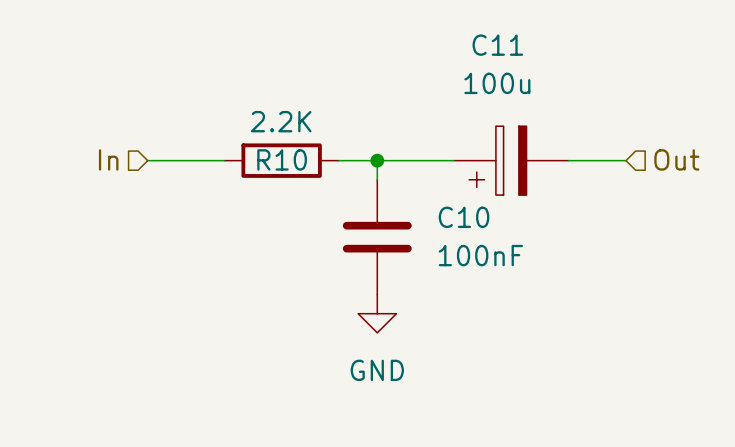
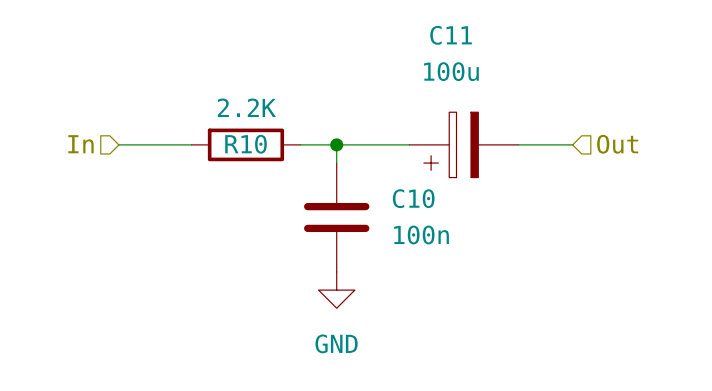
C10 value: 100nF (480, 255) -> 100n (421, 234)

